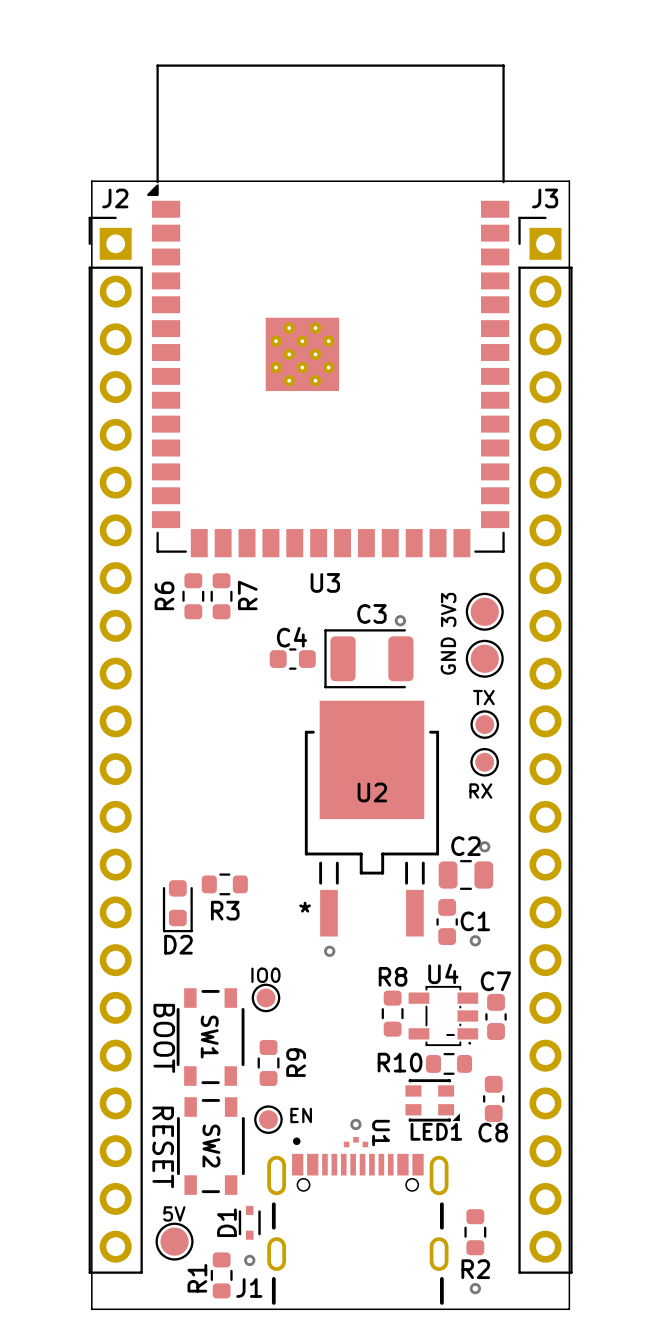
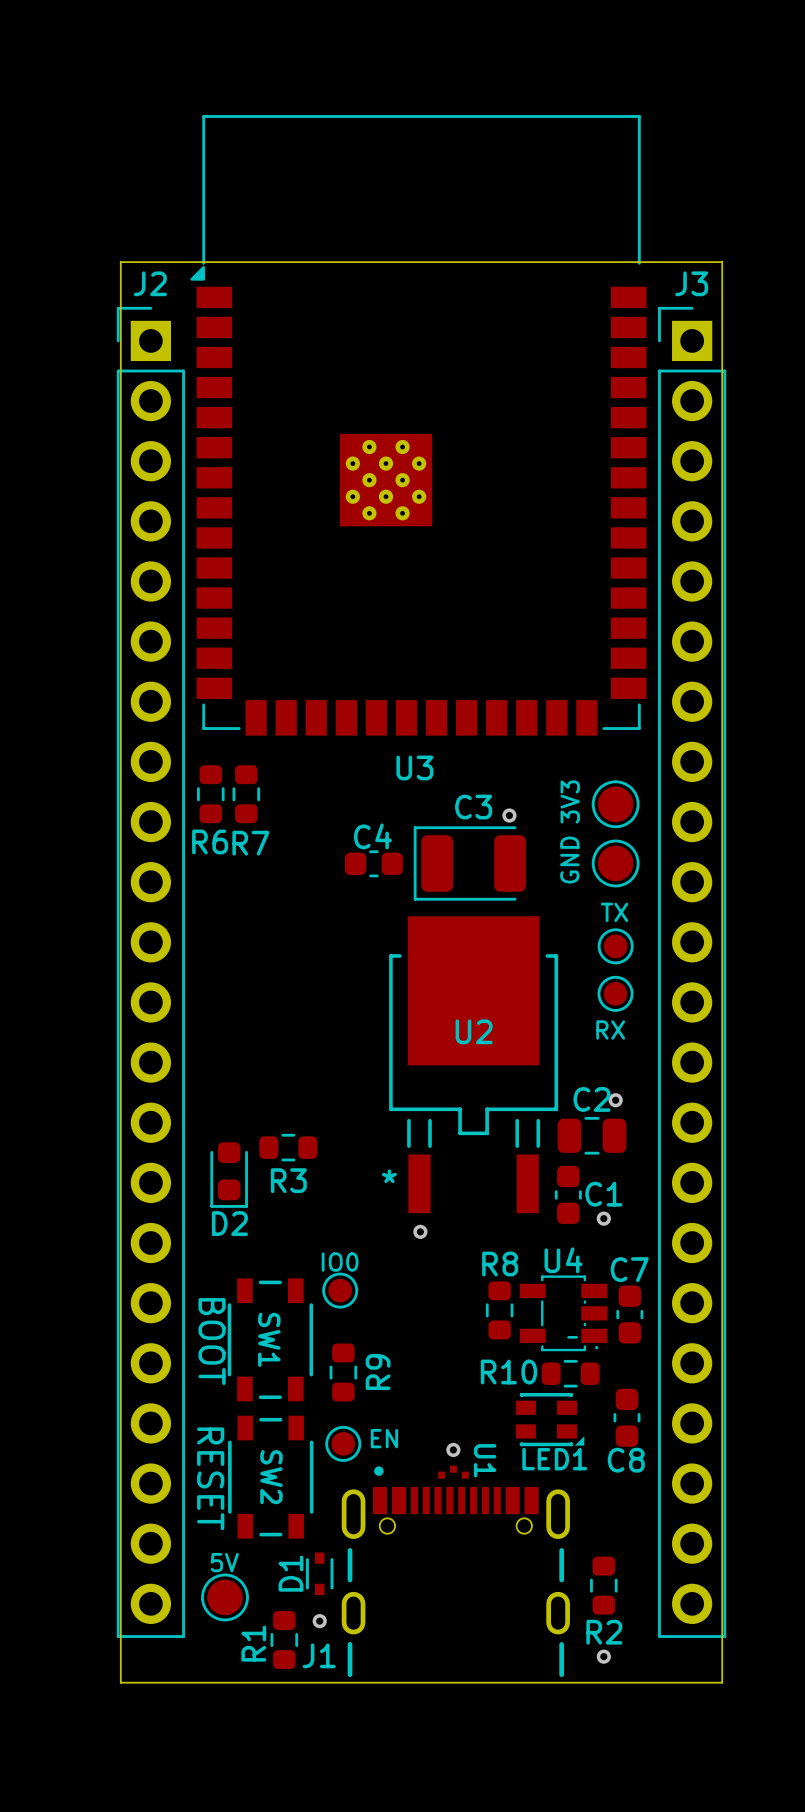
R6 name rotation: 0° (164, 595) -> 90° clockwise (210, 841)
R6 name position: R6 (164, 595) -> R6 (210, 841)
R7 name rotation: 0° (247, 595) -> 90° clockwise (250, 843)
R7 name position: R7 (247, 595) -> R7 (250, 843)
R6 position: (193, 596) -> (210, 794)
R7 position: (221, 596) -> (246, 794)

